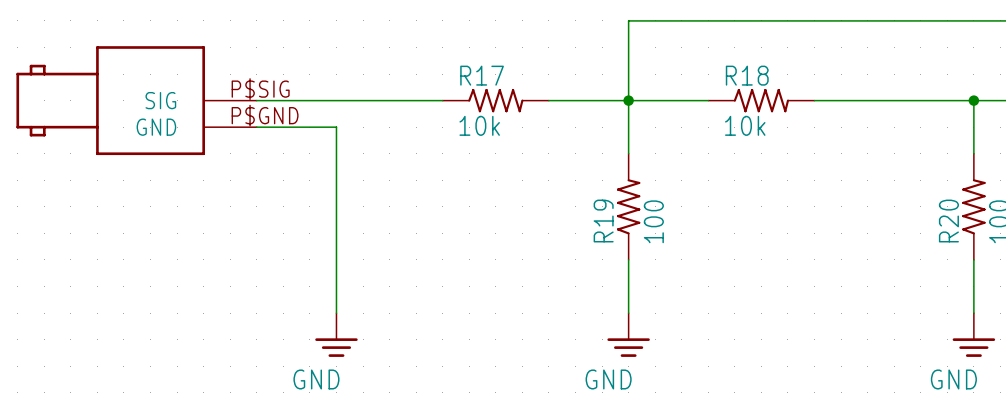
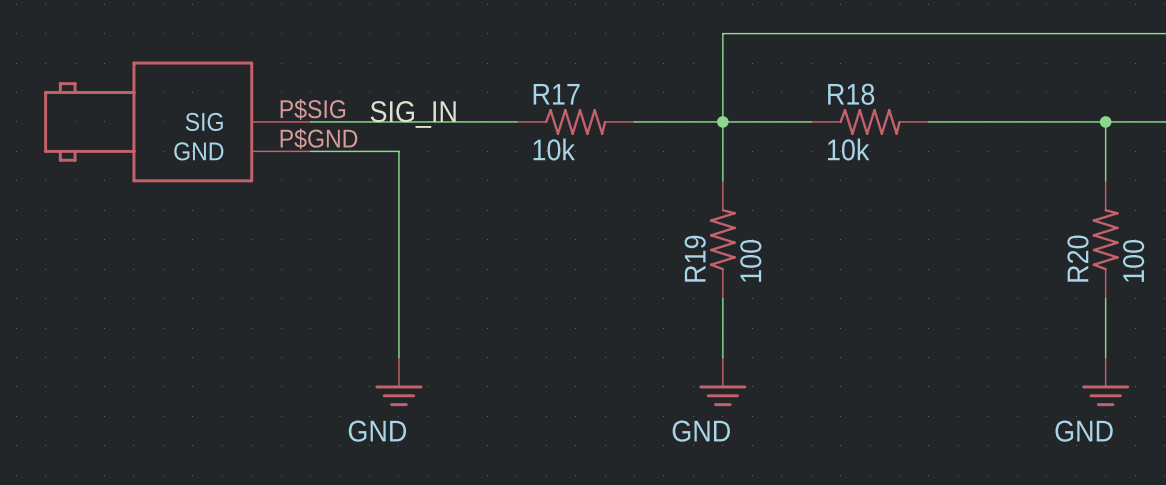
label: none -> SIG_IN (413, 114)

